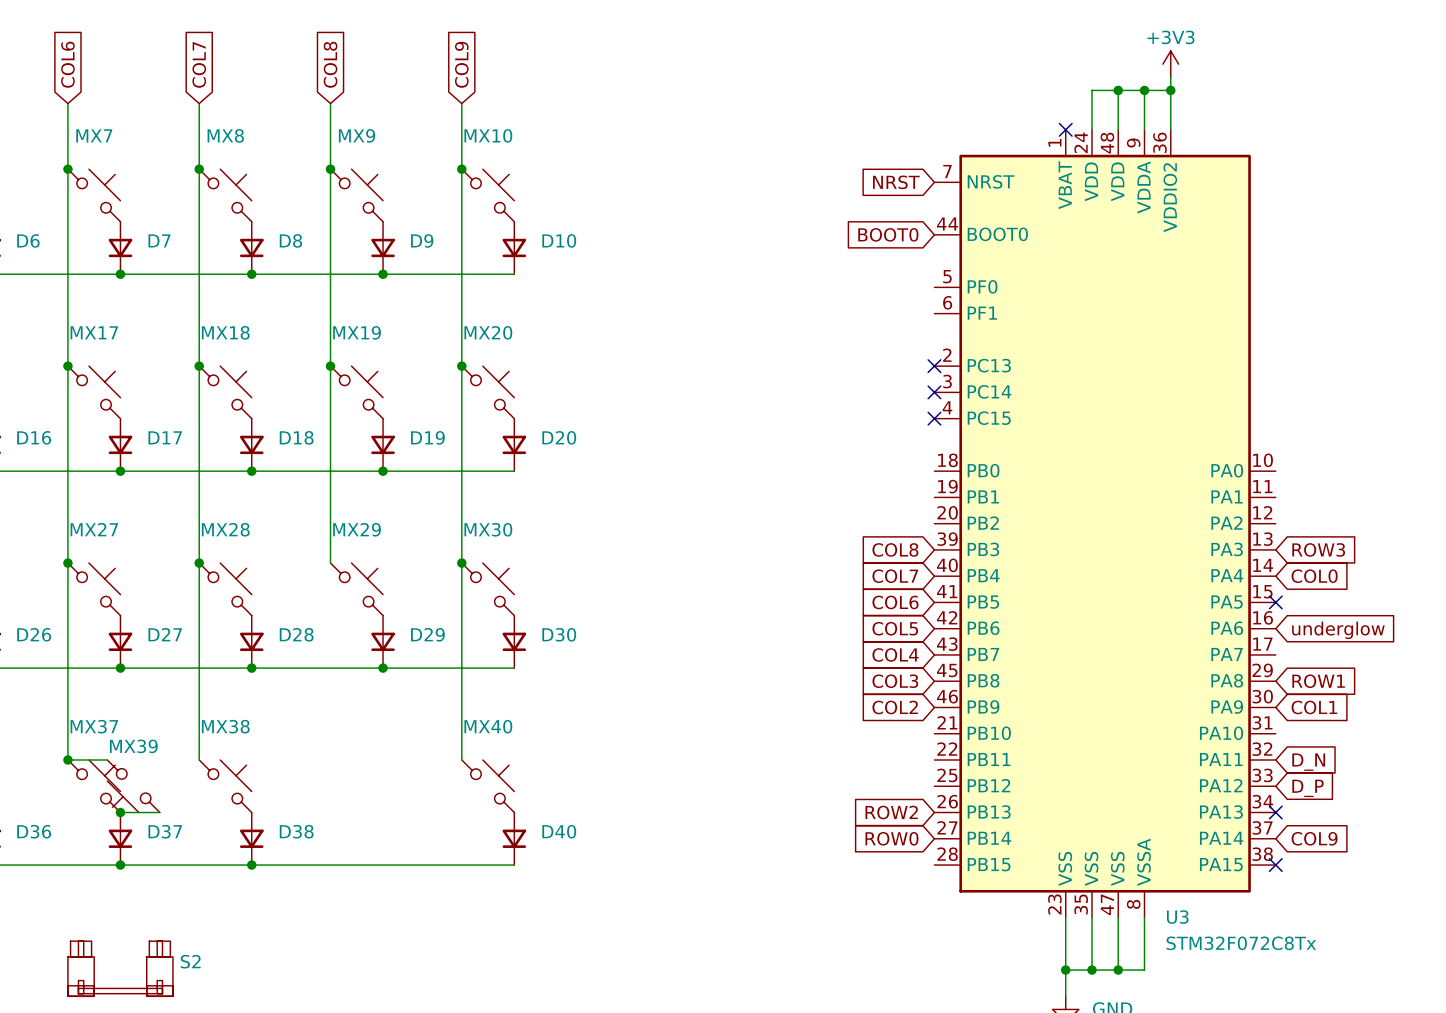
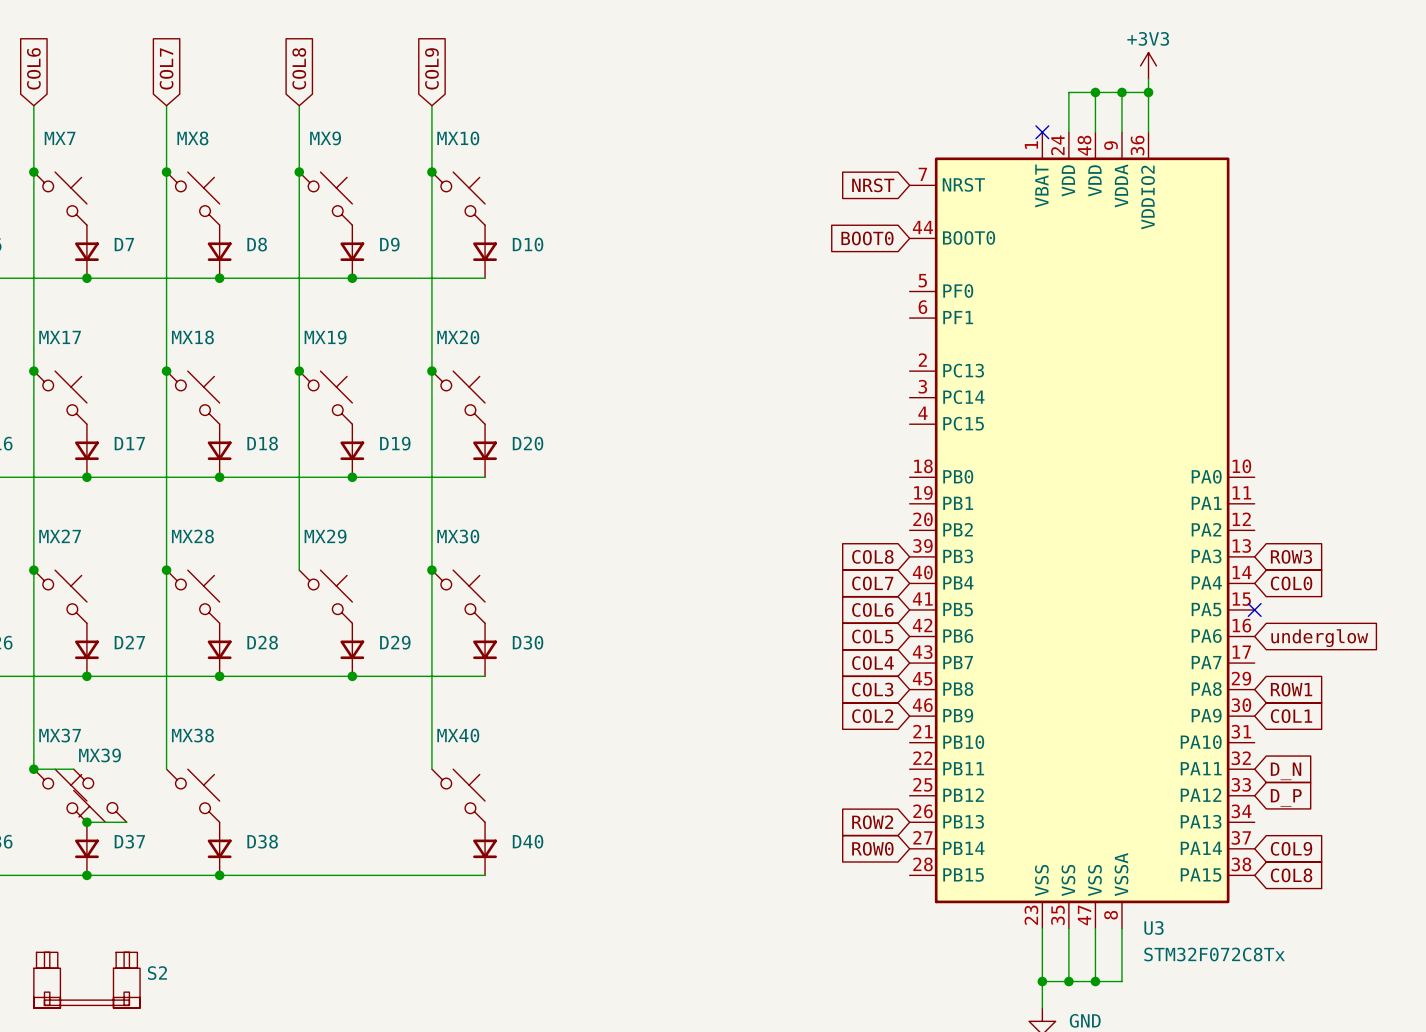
no-connect mark: (934, 366) -> none
no-connect mark: (934, 392) -> none
no-connect mark: (934, 418) -> none
no-connect mark: (1275, 812) -> none
no-connect mark: (1275, 865) -> none
global label: none -> COL8 (1291, 875)

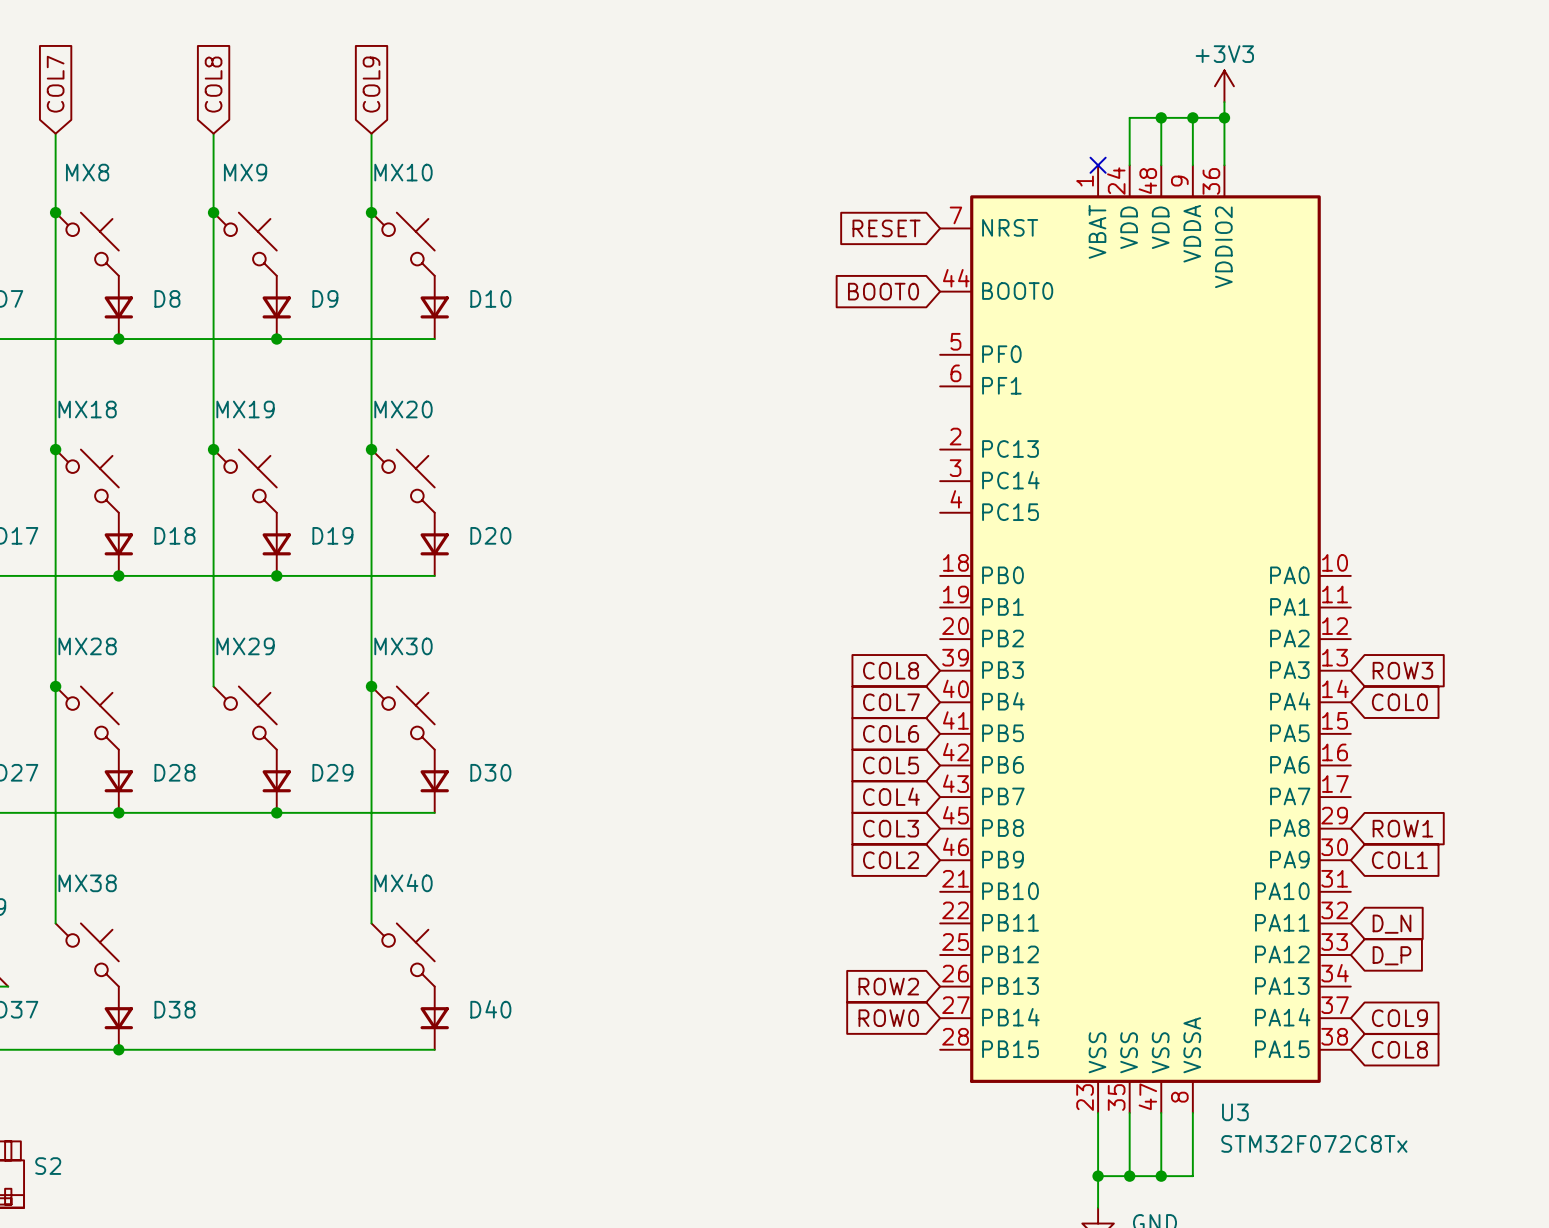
global label: NRST (873, 185) -> RESET (886, 228)
no-connect mark: (1254, 609) -> none
global label: underglow (1319, 638) -> none

